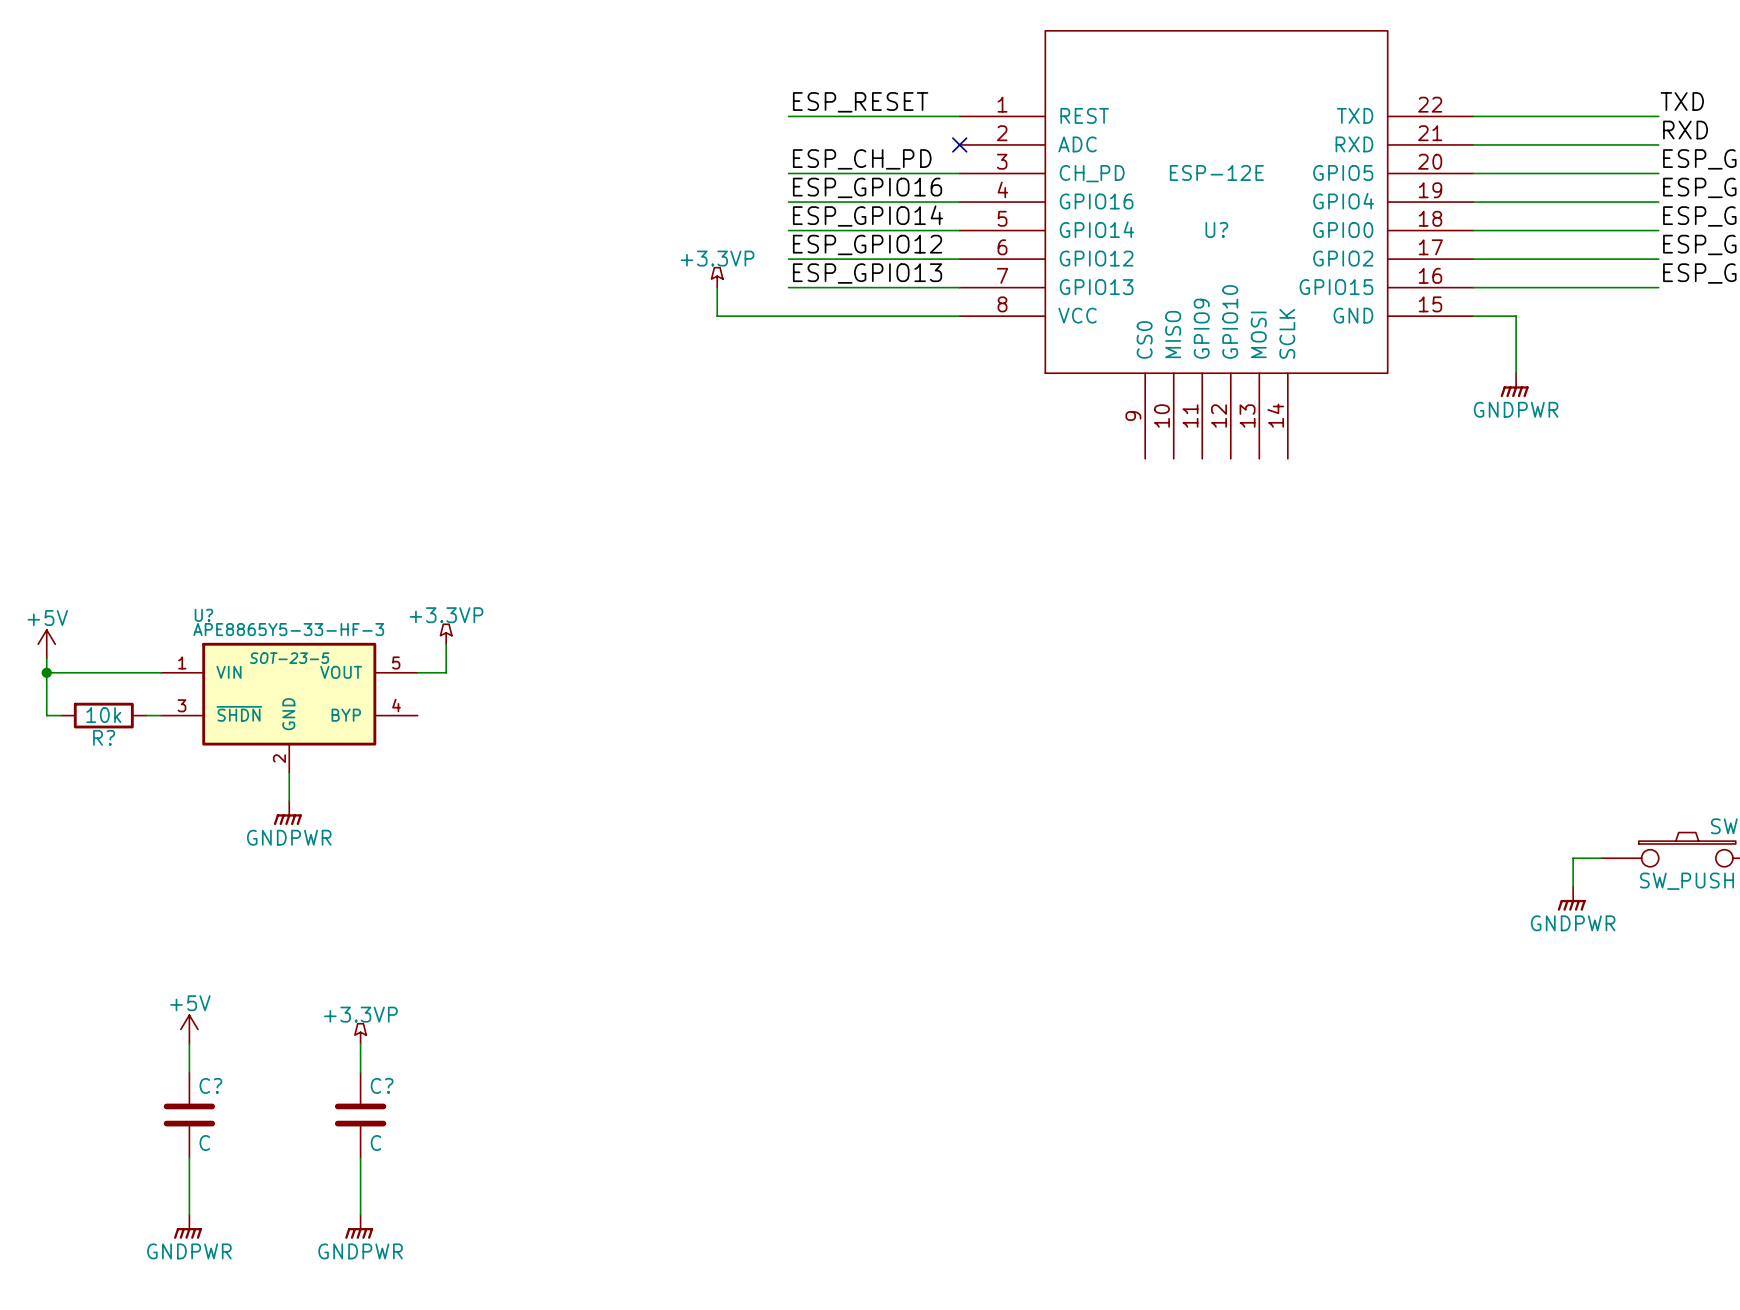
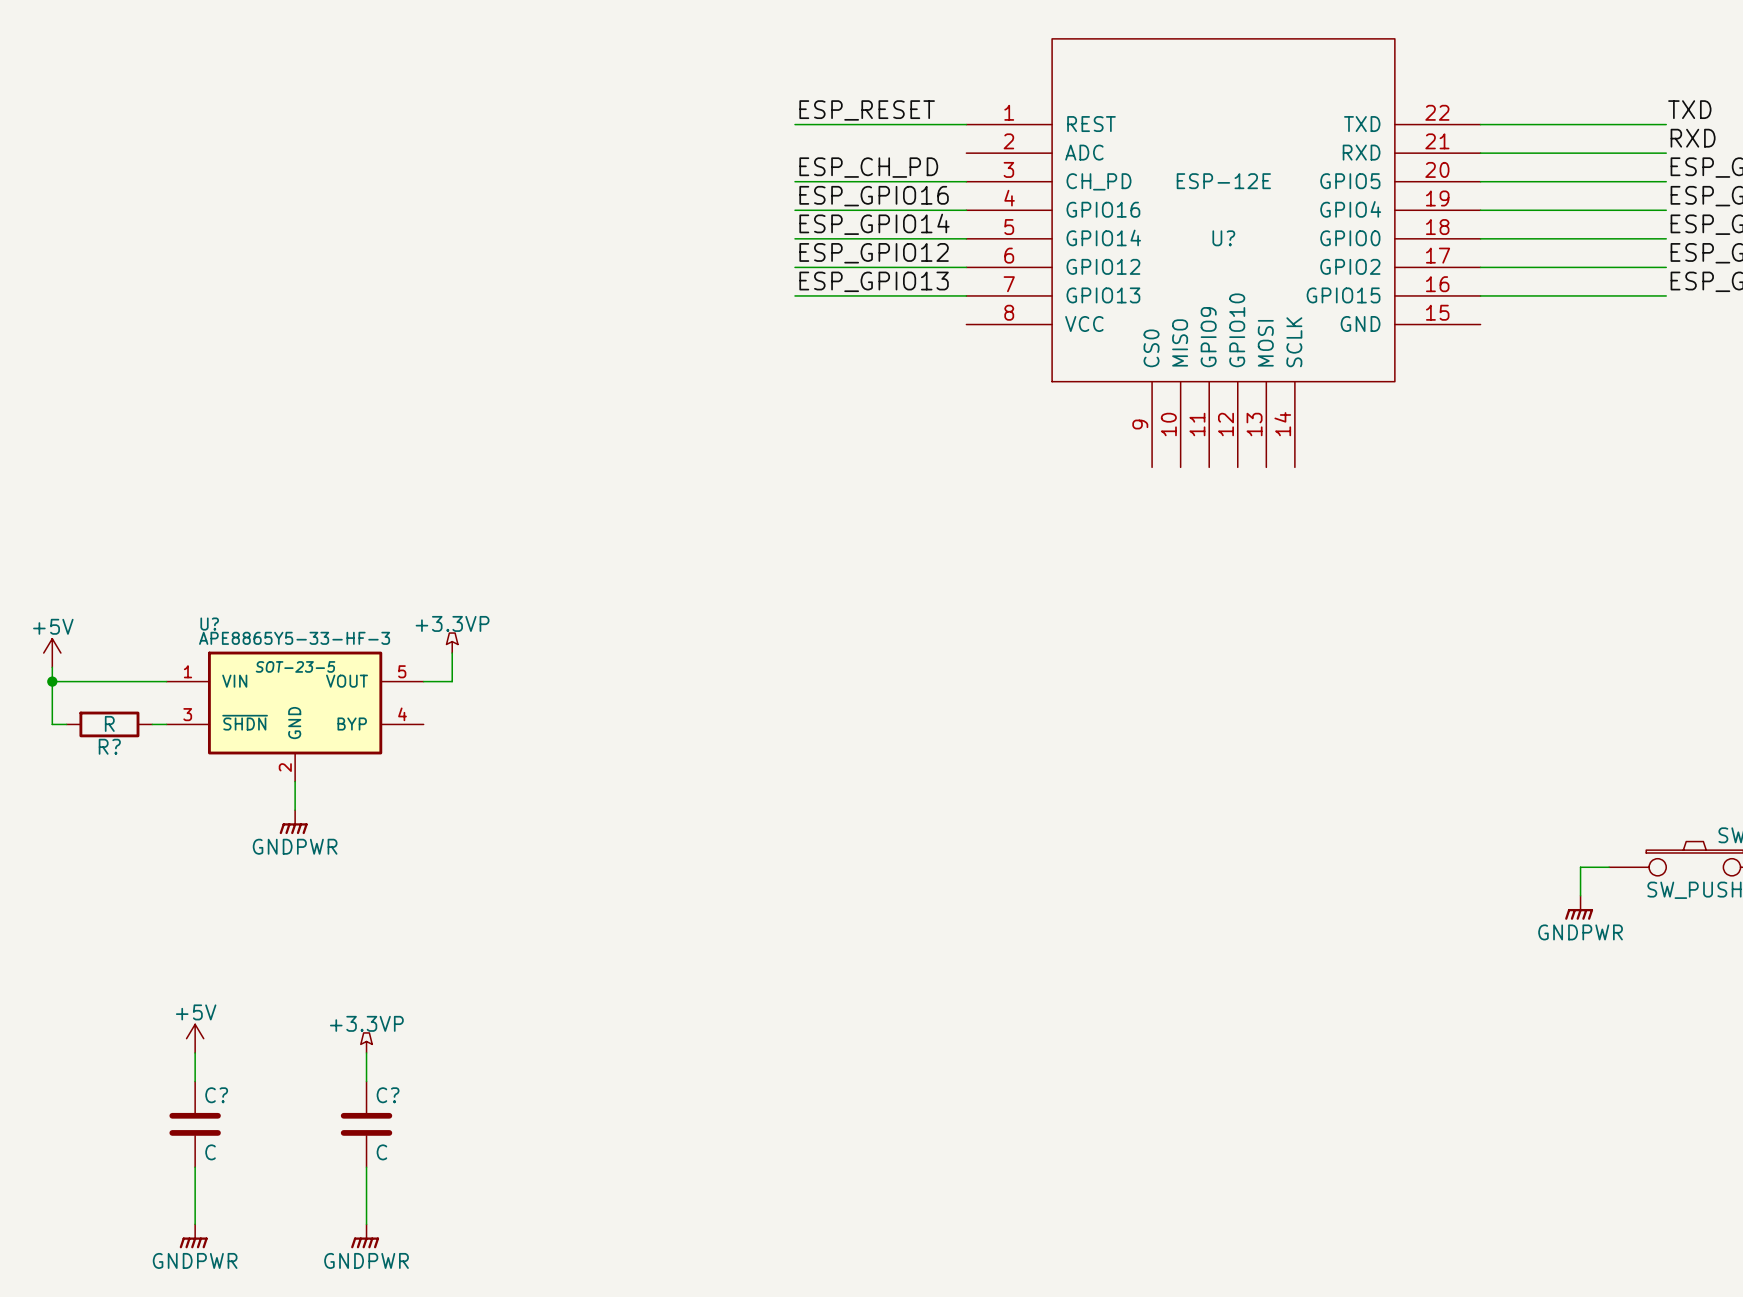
no-connect mark: (959, 144) -> none
power symbol: +3.3VP (717, 277) -> none
wire: (717, 287) (717, 316) (959, 316) -> none
wire: (1473, 316) (1516, 316) (1516, 373) -> none
power symbol: GNDPWR (1514, 385) -> none
R? value: 10k (103, 715) -> R (109, 723)

